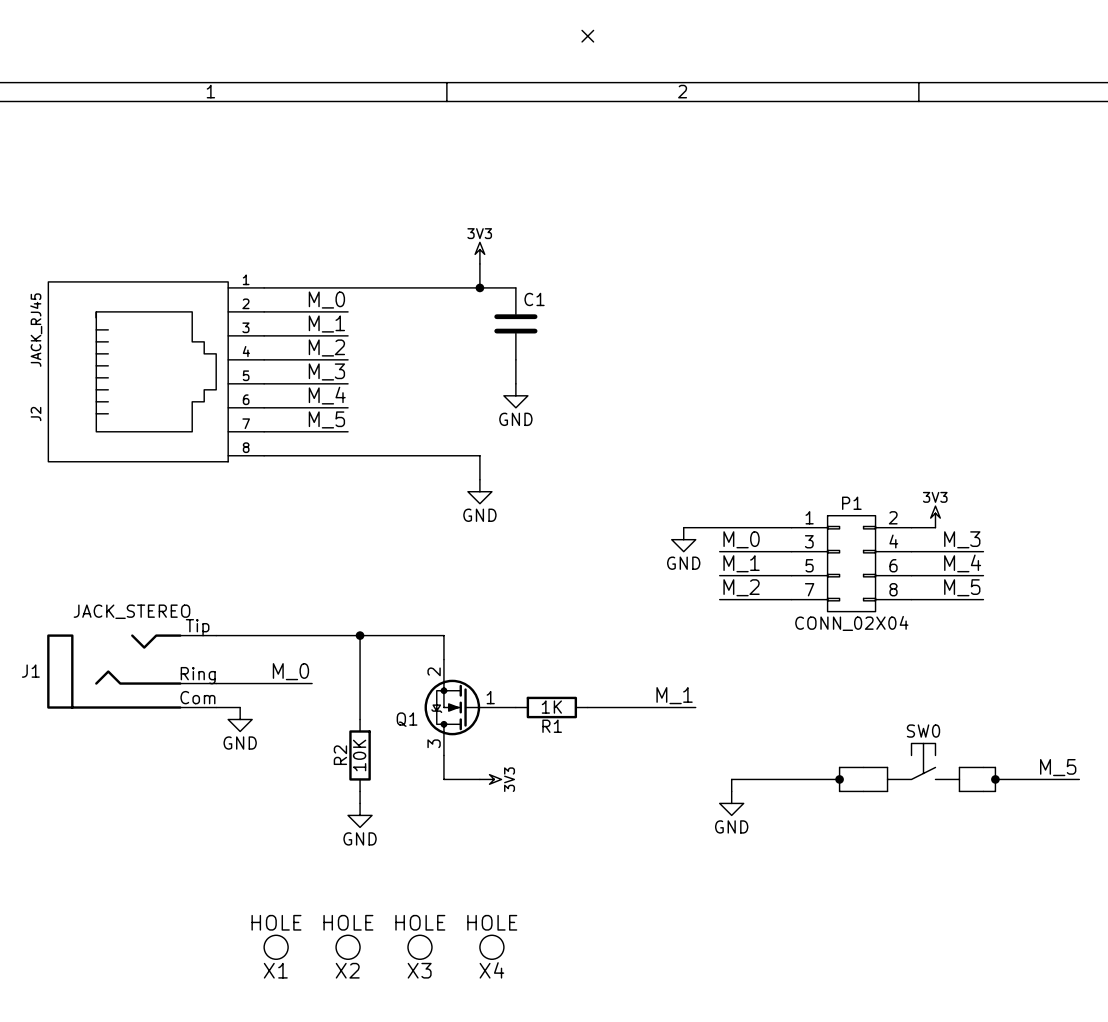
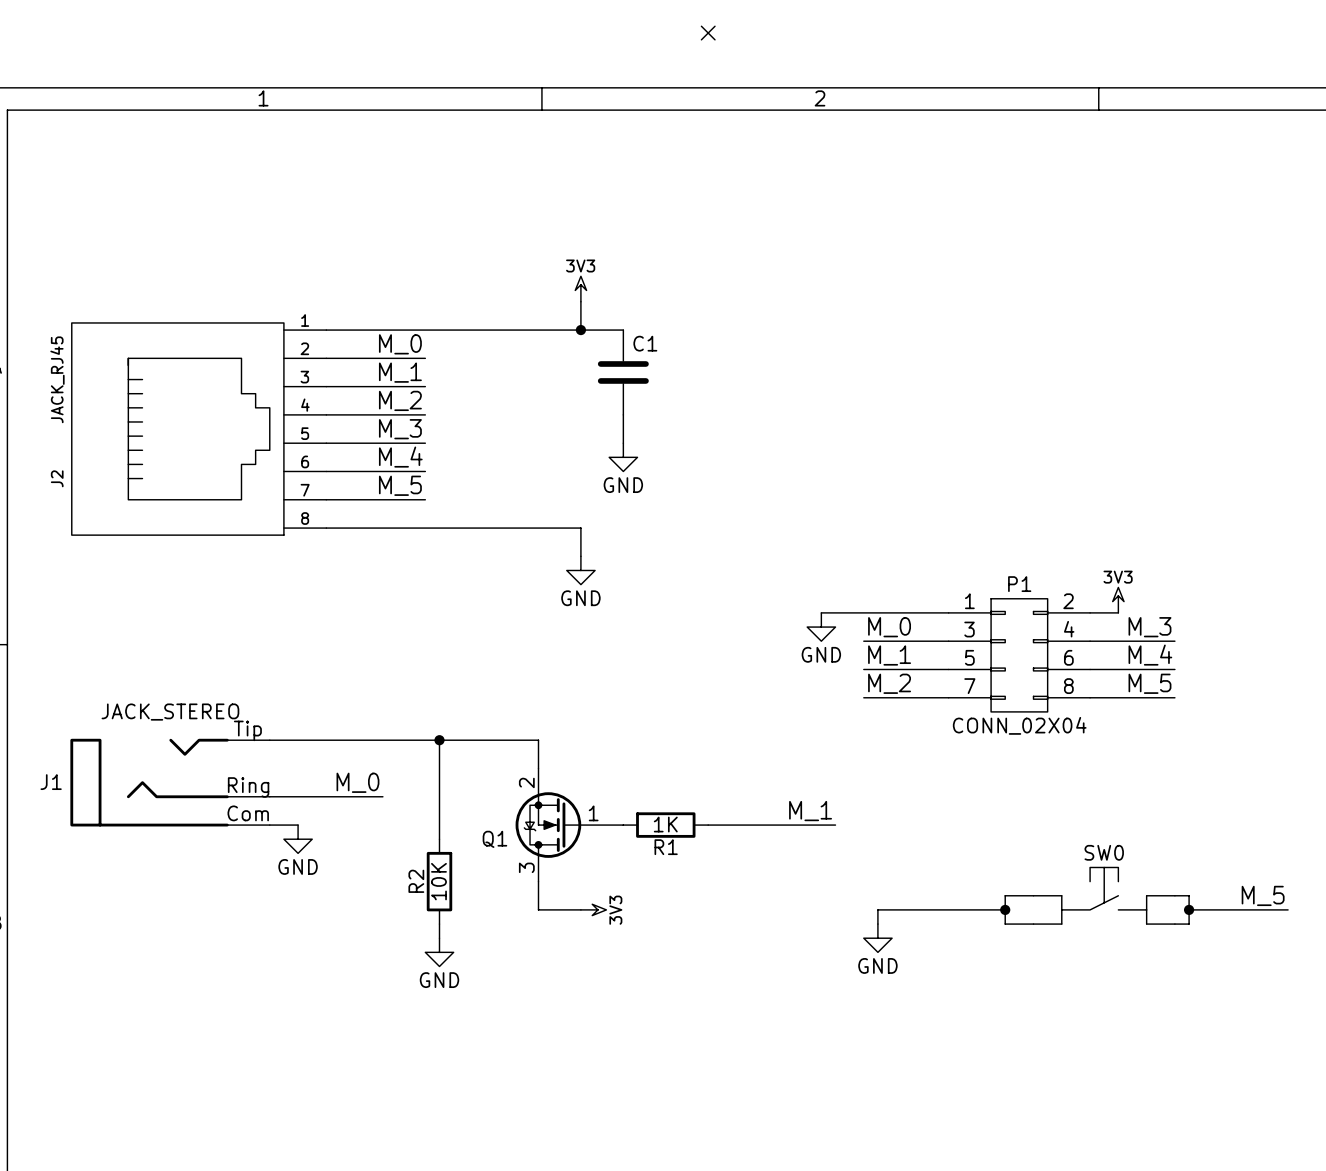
X1: HOLE (276, 947) -> none
X2: HOLE (348, 947) -> none
X3: HOLE (419, 947) -> none
X4: HOLE (491, 947) -> none

